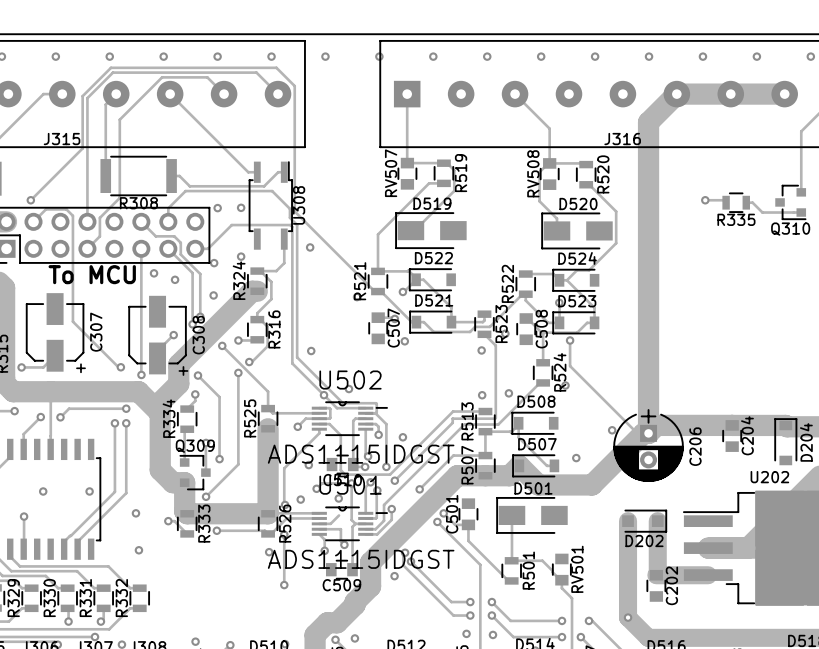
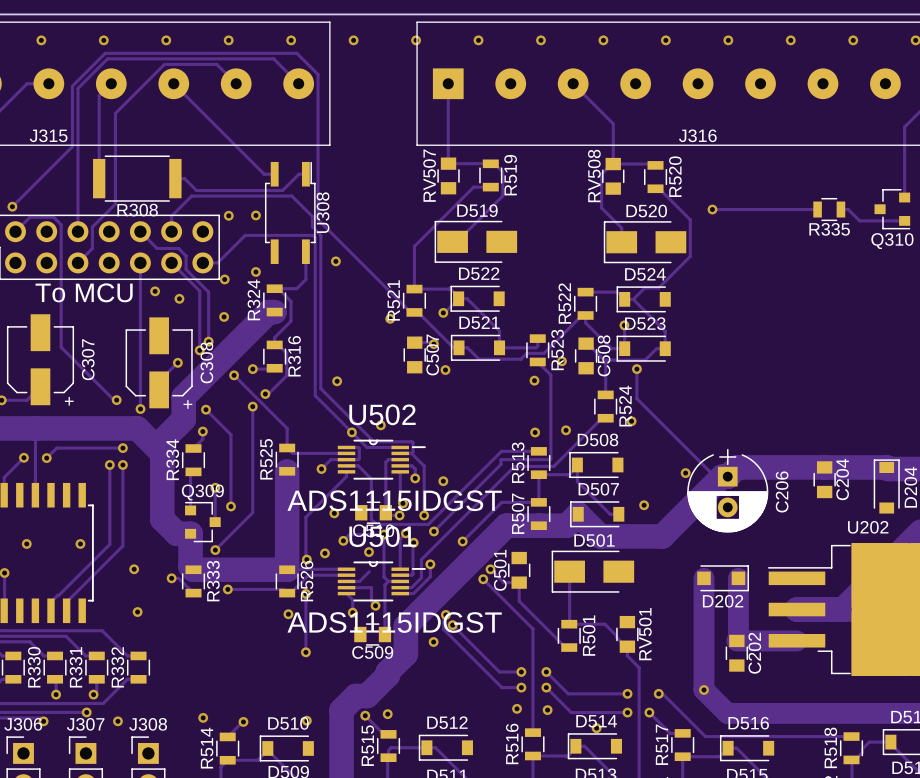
track: (784, 94) (676, 94) (648, 122) (648, 433) -> none
track: (705, 200) (723, 200) (726, 202) -> (712, 209) (817, 209)
via: (705, 200) -> none
via: none -> (712, 209)

